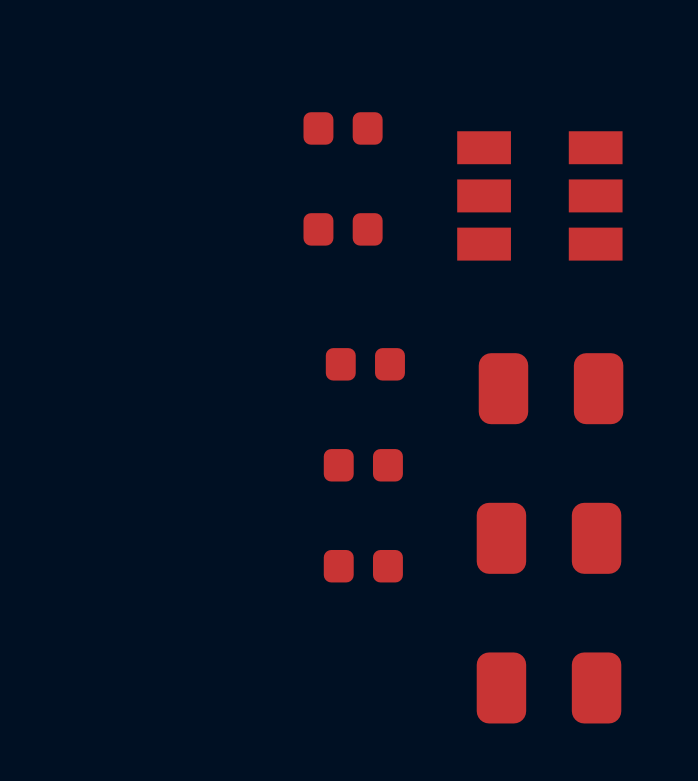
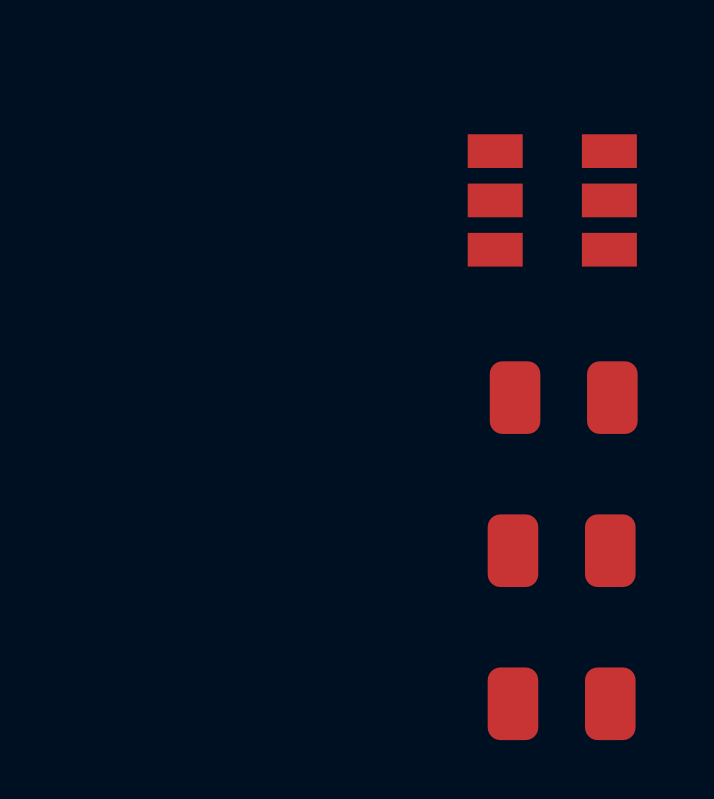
part: (343, 128) -> none
part: (343, 229) -> none
part: (365, 364) -> none
part: (363, 465) -> none
part: (363, 566) -> none

